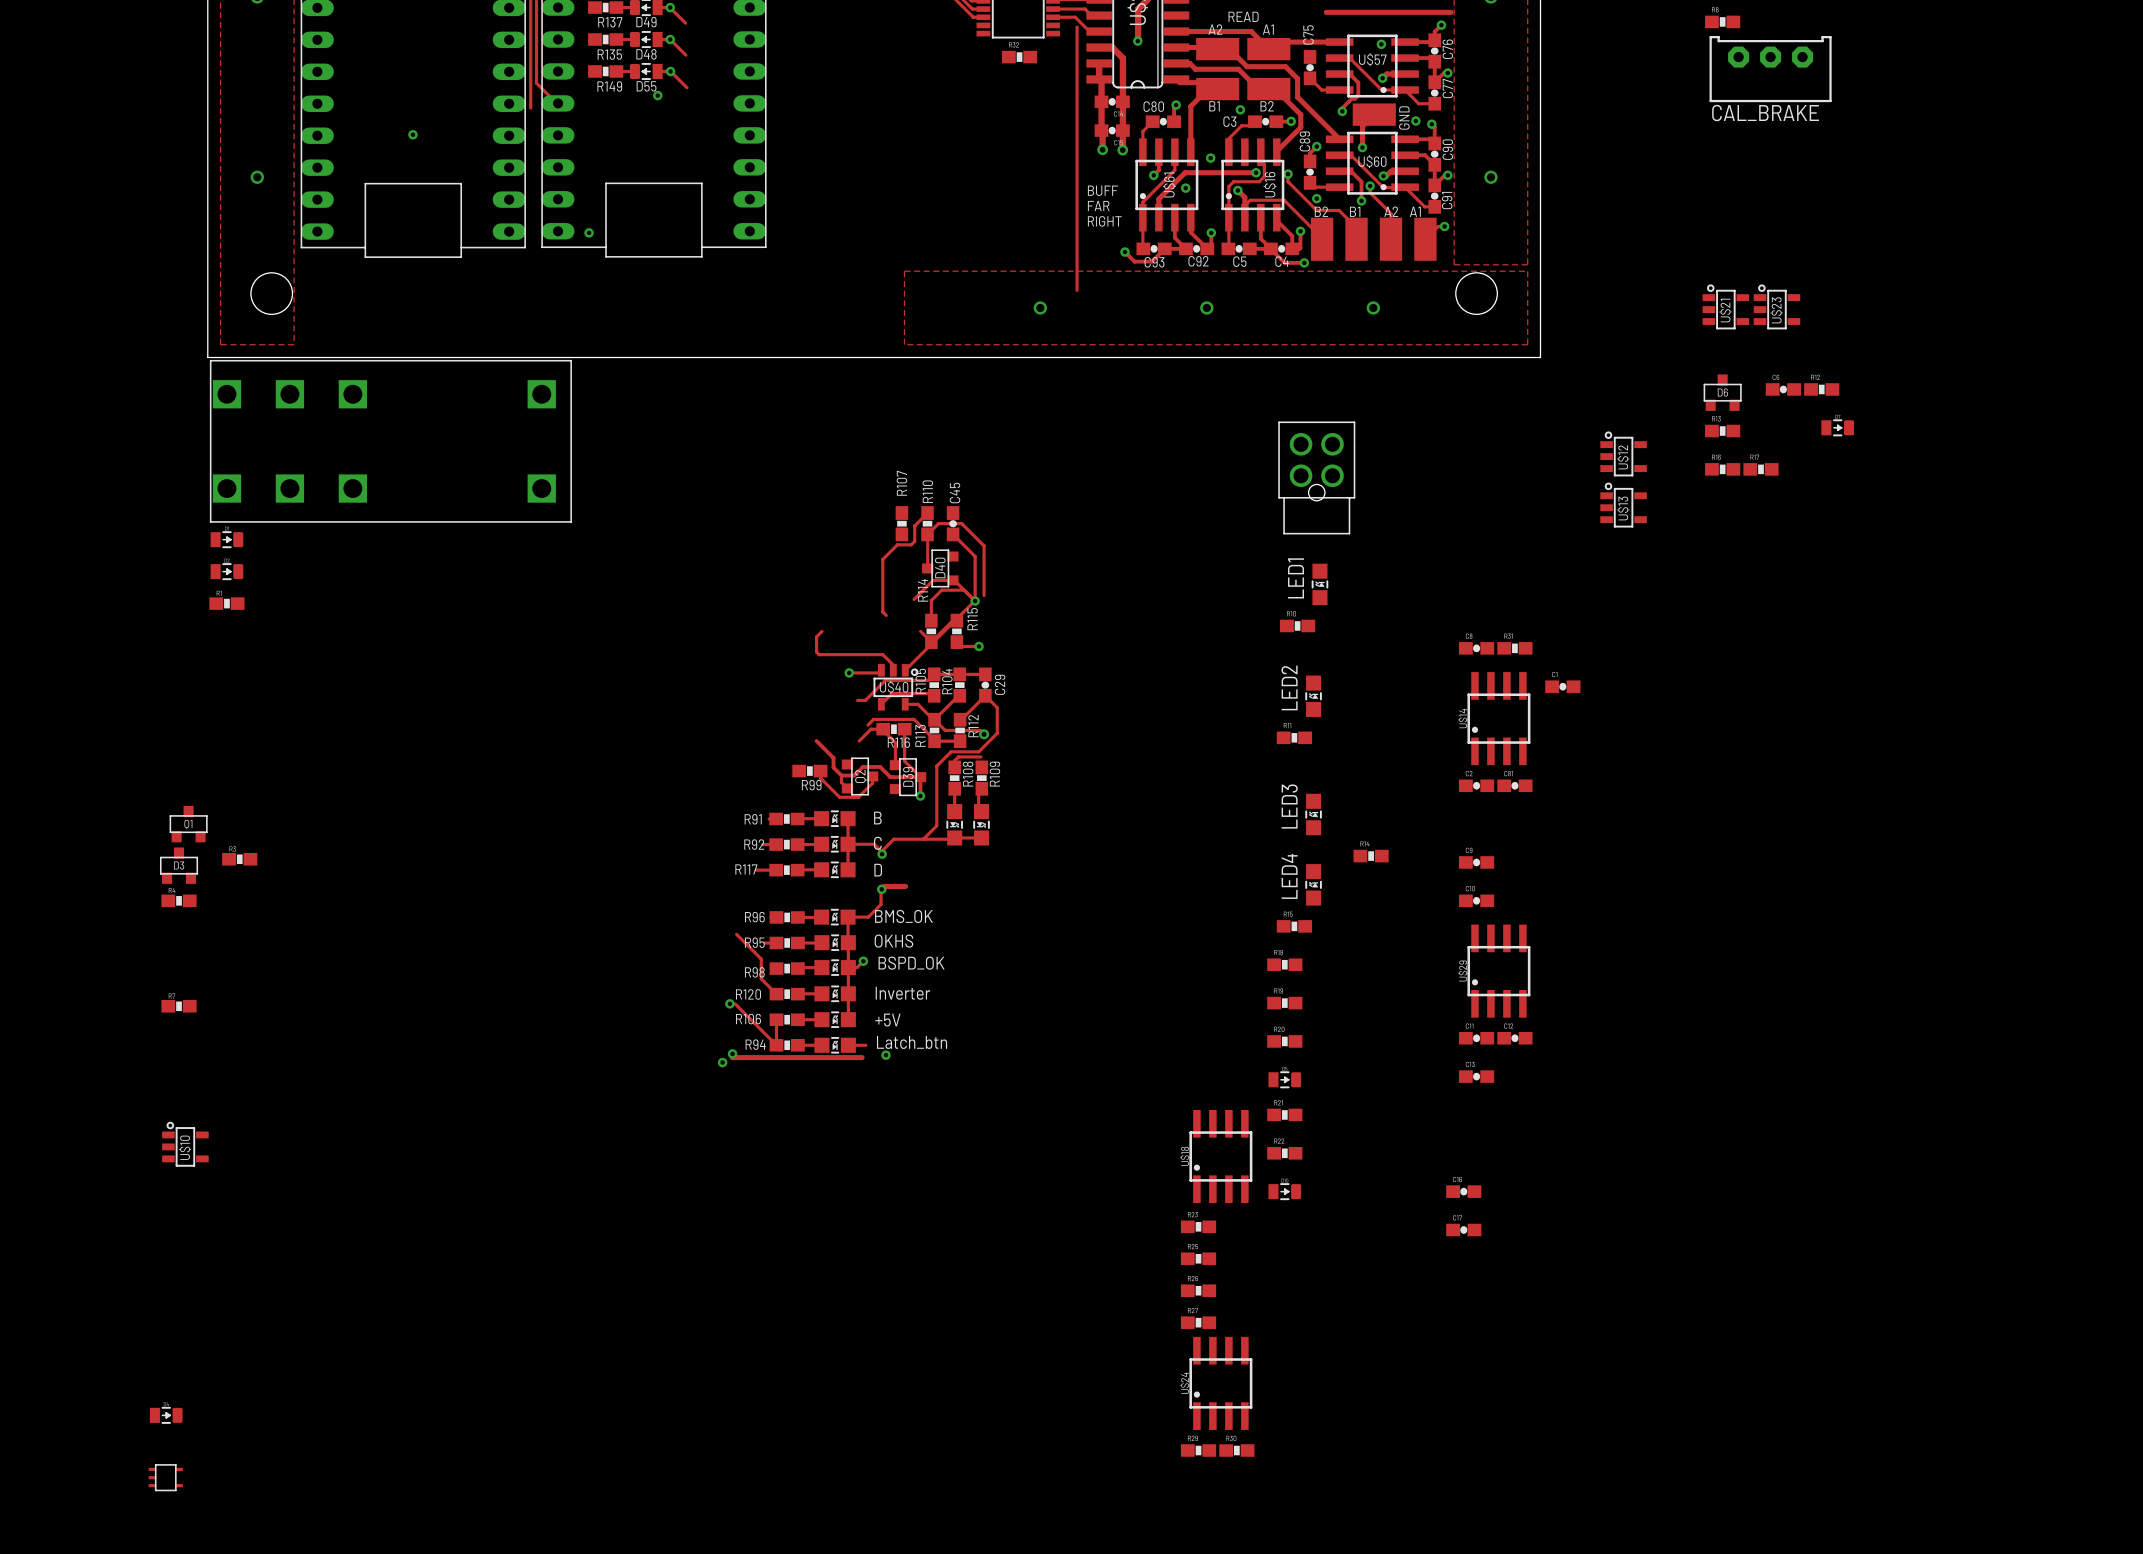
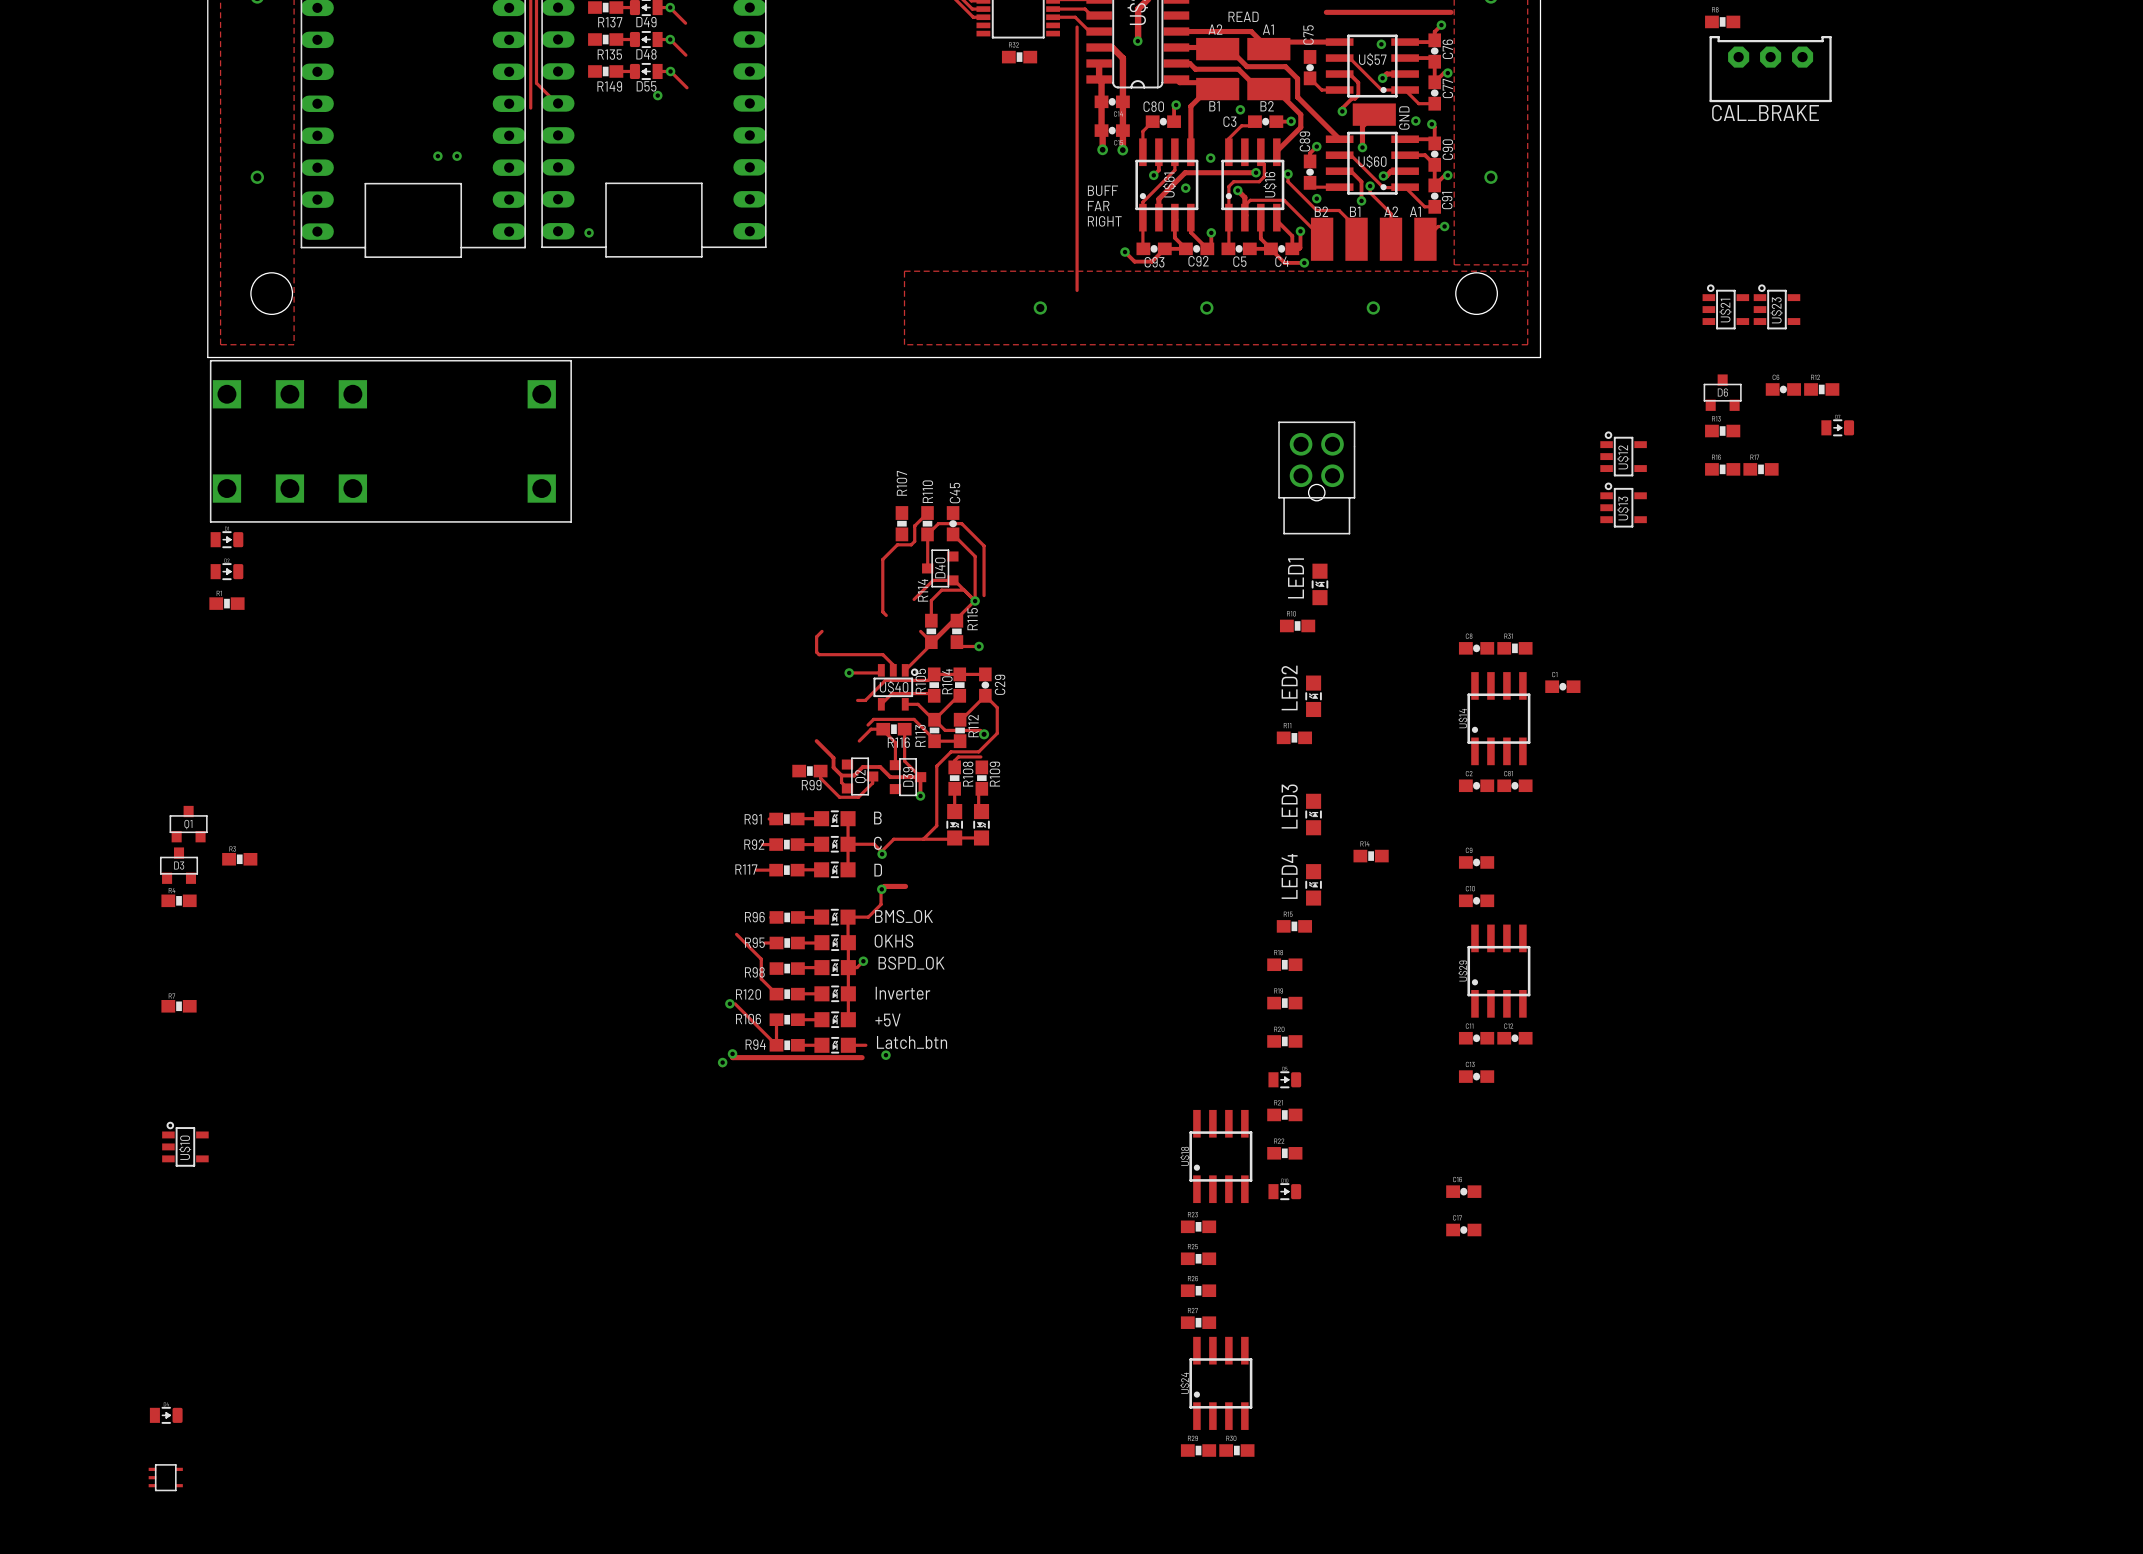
via: (412, 134) -> none
via: none -> (437, 156)
via: none -> (457, 156)

